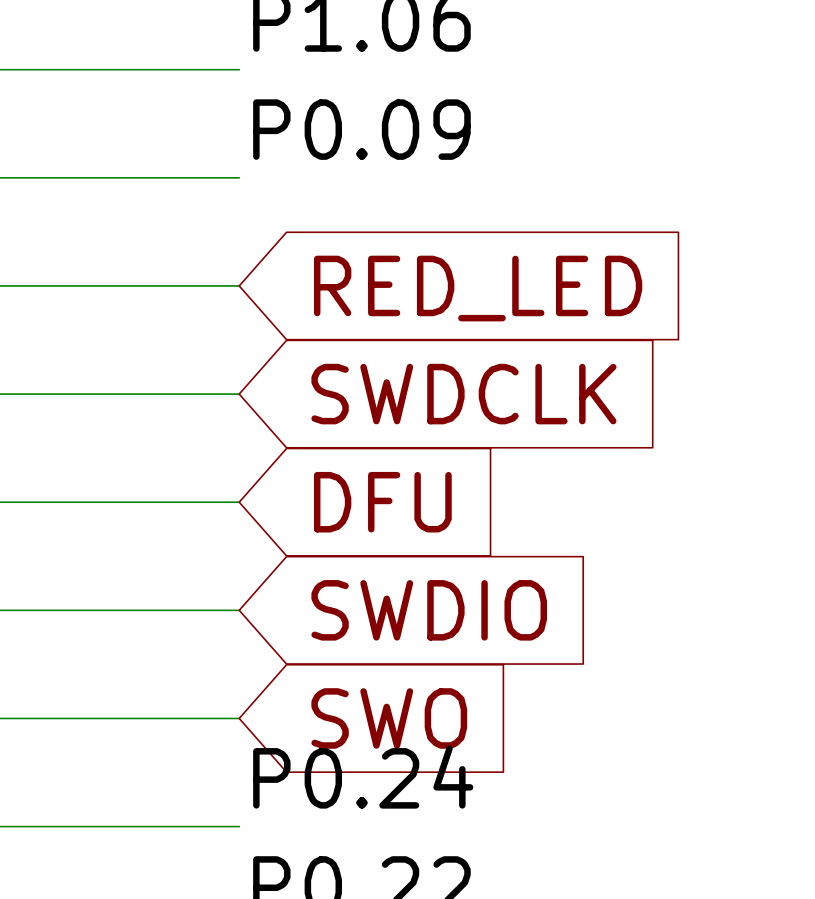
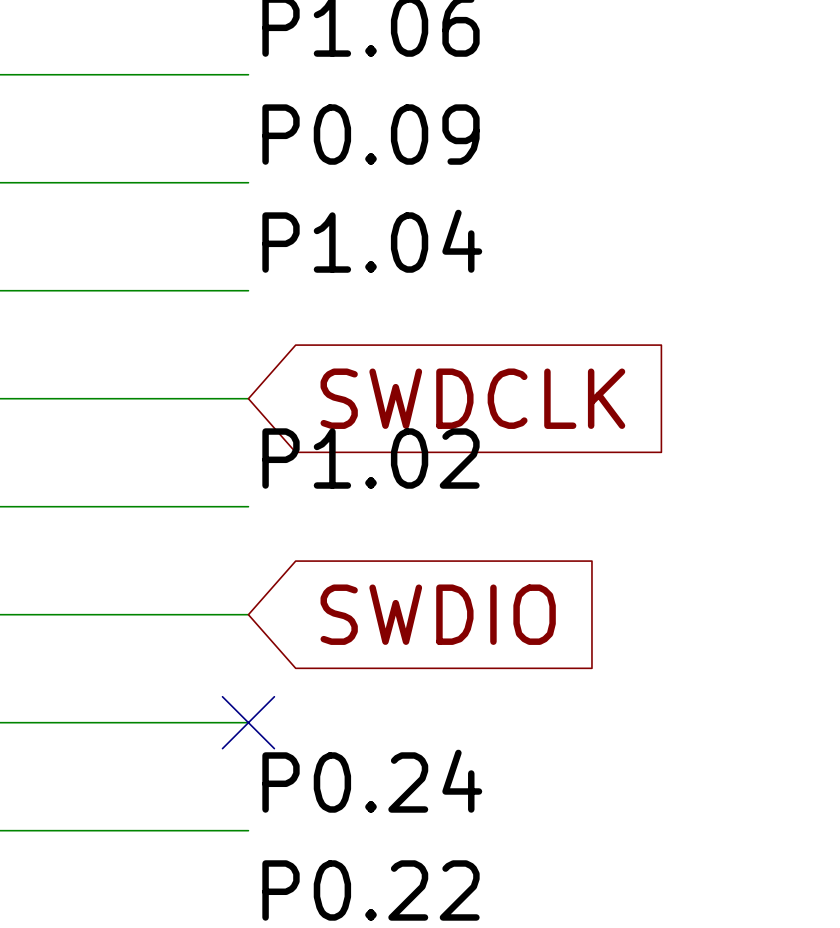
label: none -> P1.04 (372, 241)
global label: RED_LED (478, 288) -> none
label: none -> P1.02 (370, 458)
global label: DFU (382, 502) -> none
no-connect mark: none -> (248, 722)
global label: SWO (389, 718) -> none

